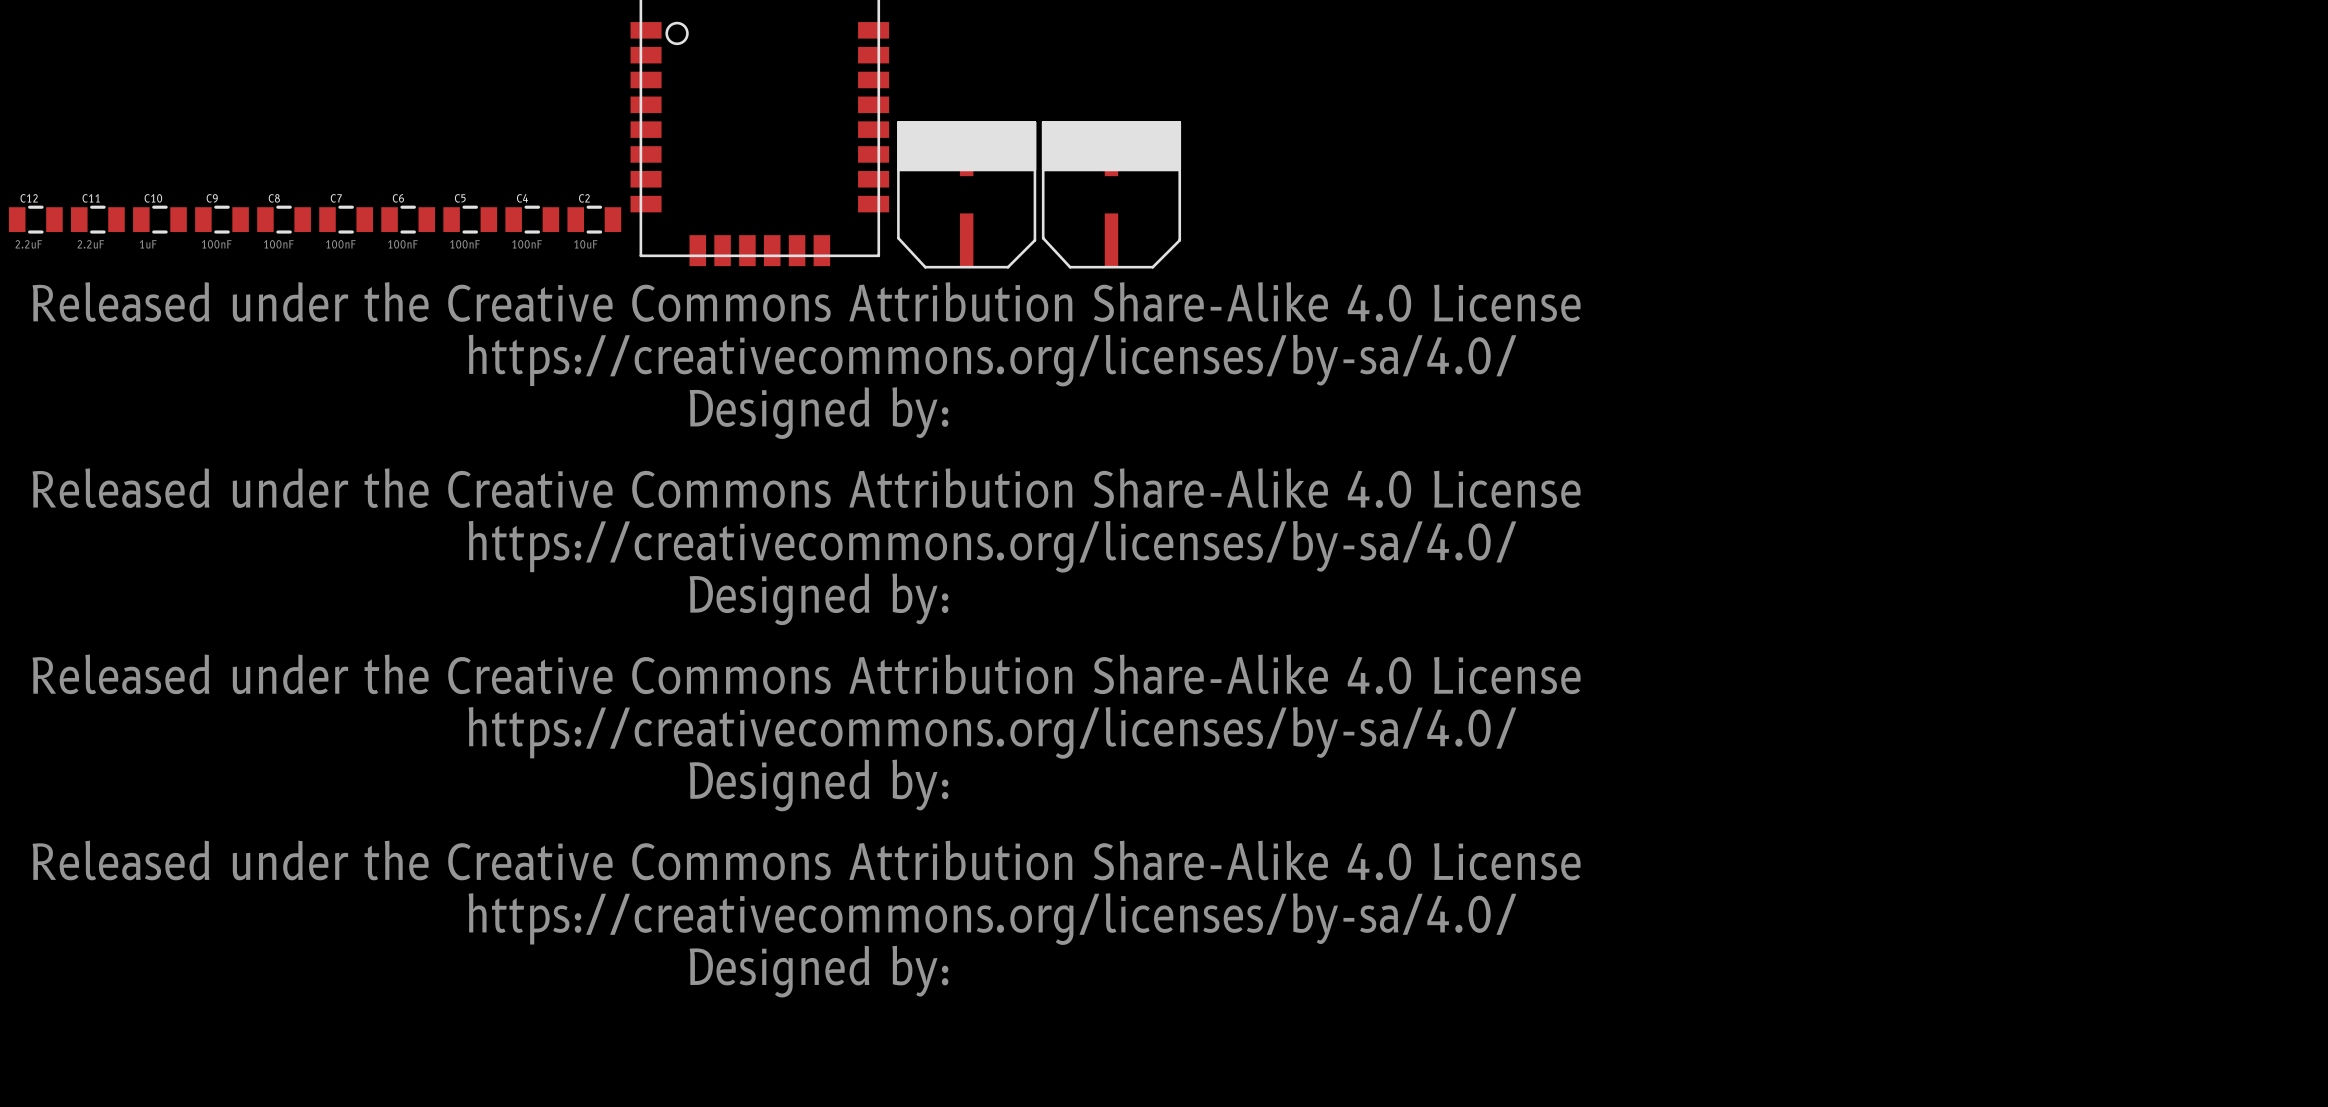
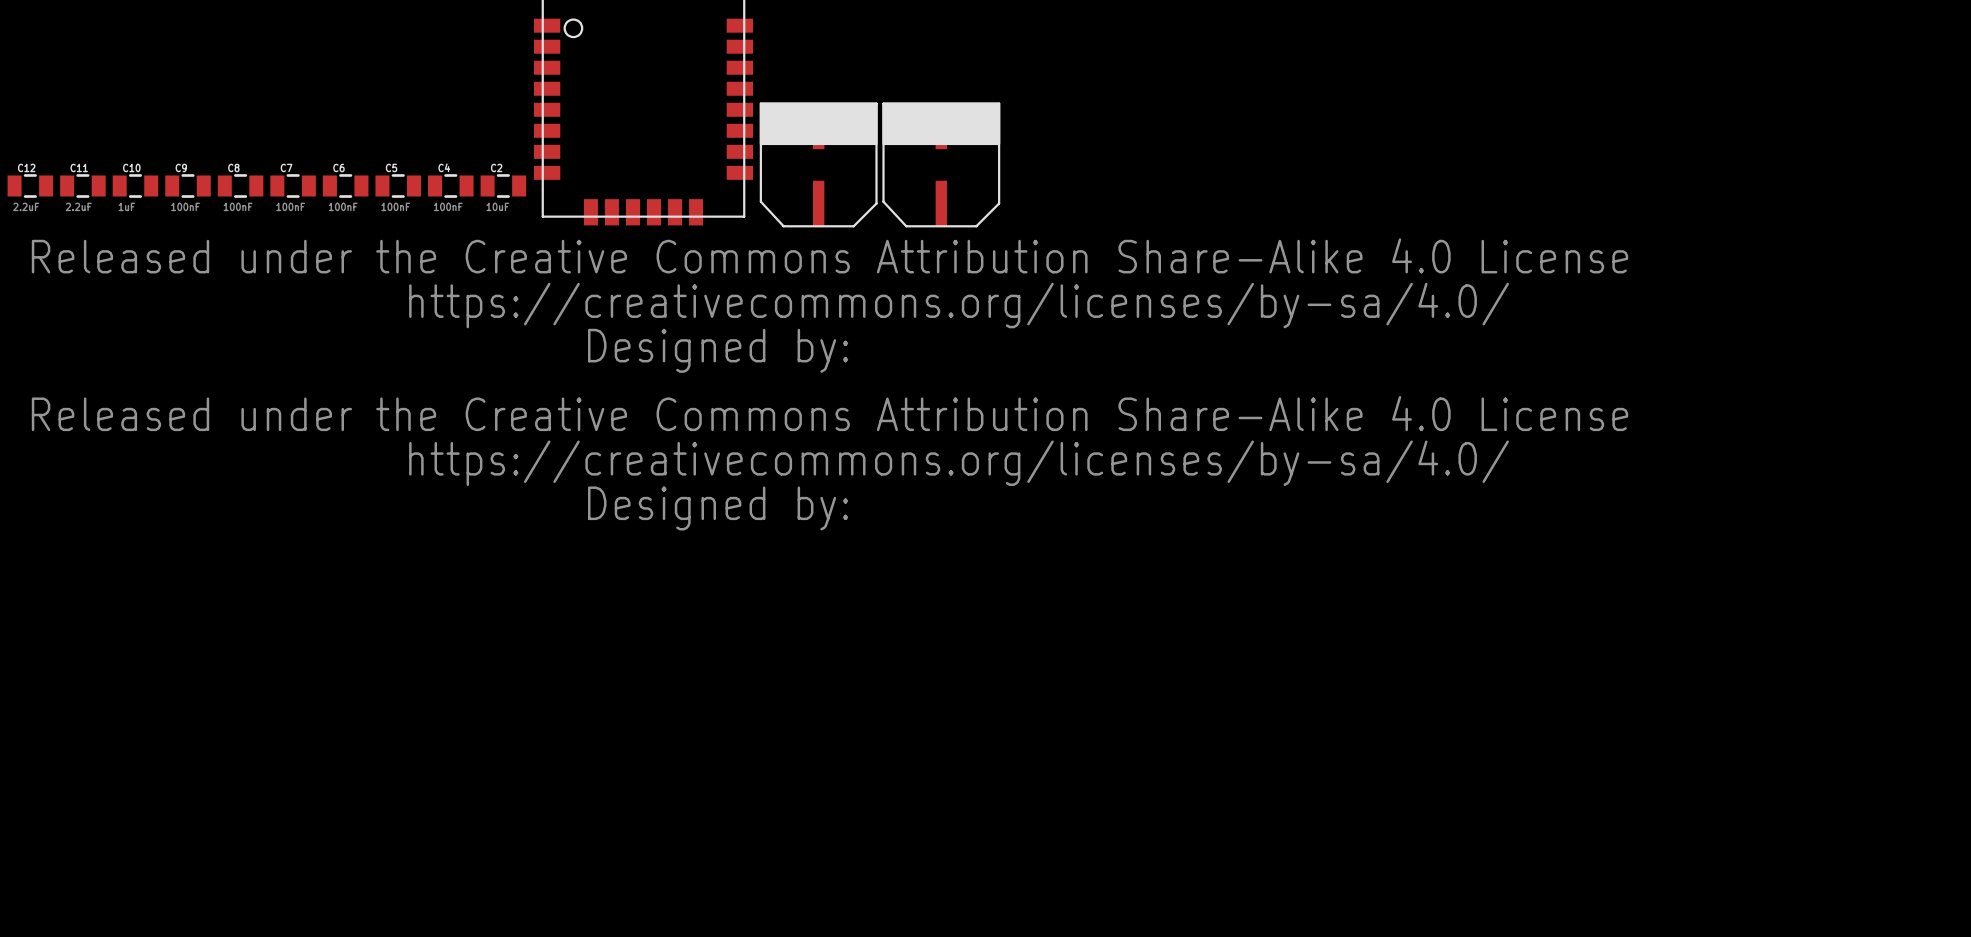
drawing: [32, 654, 1581, 998] -> none

